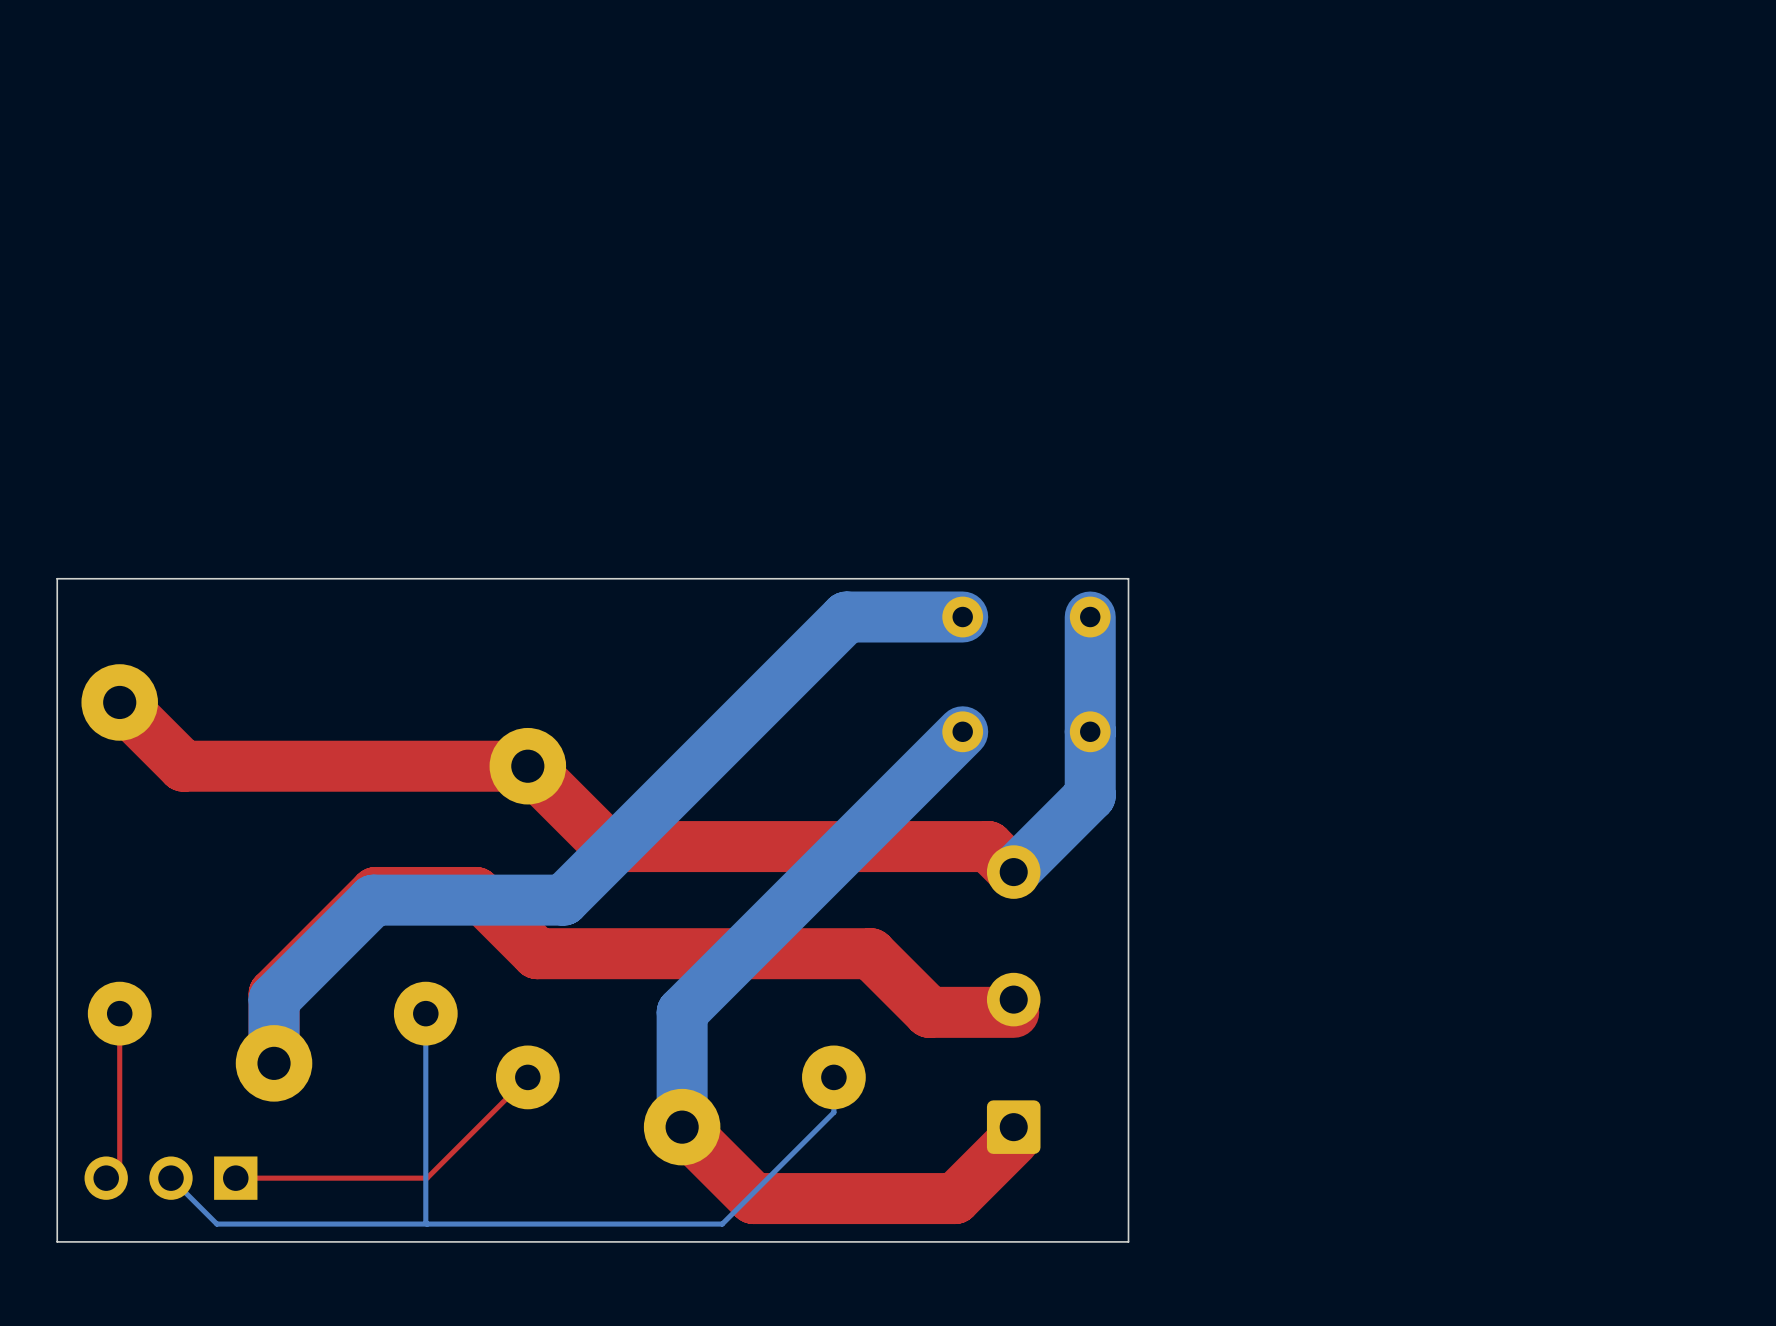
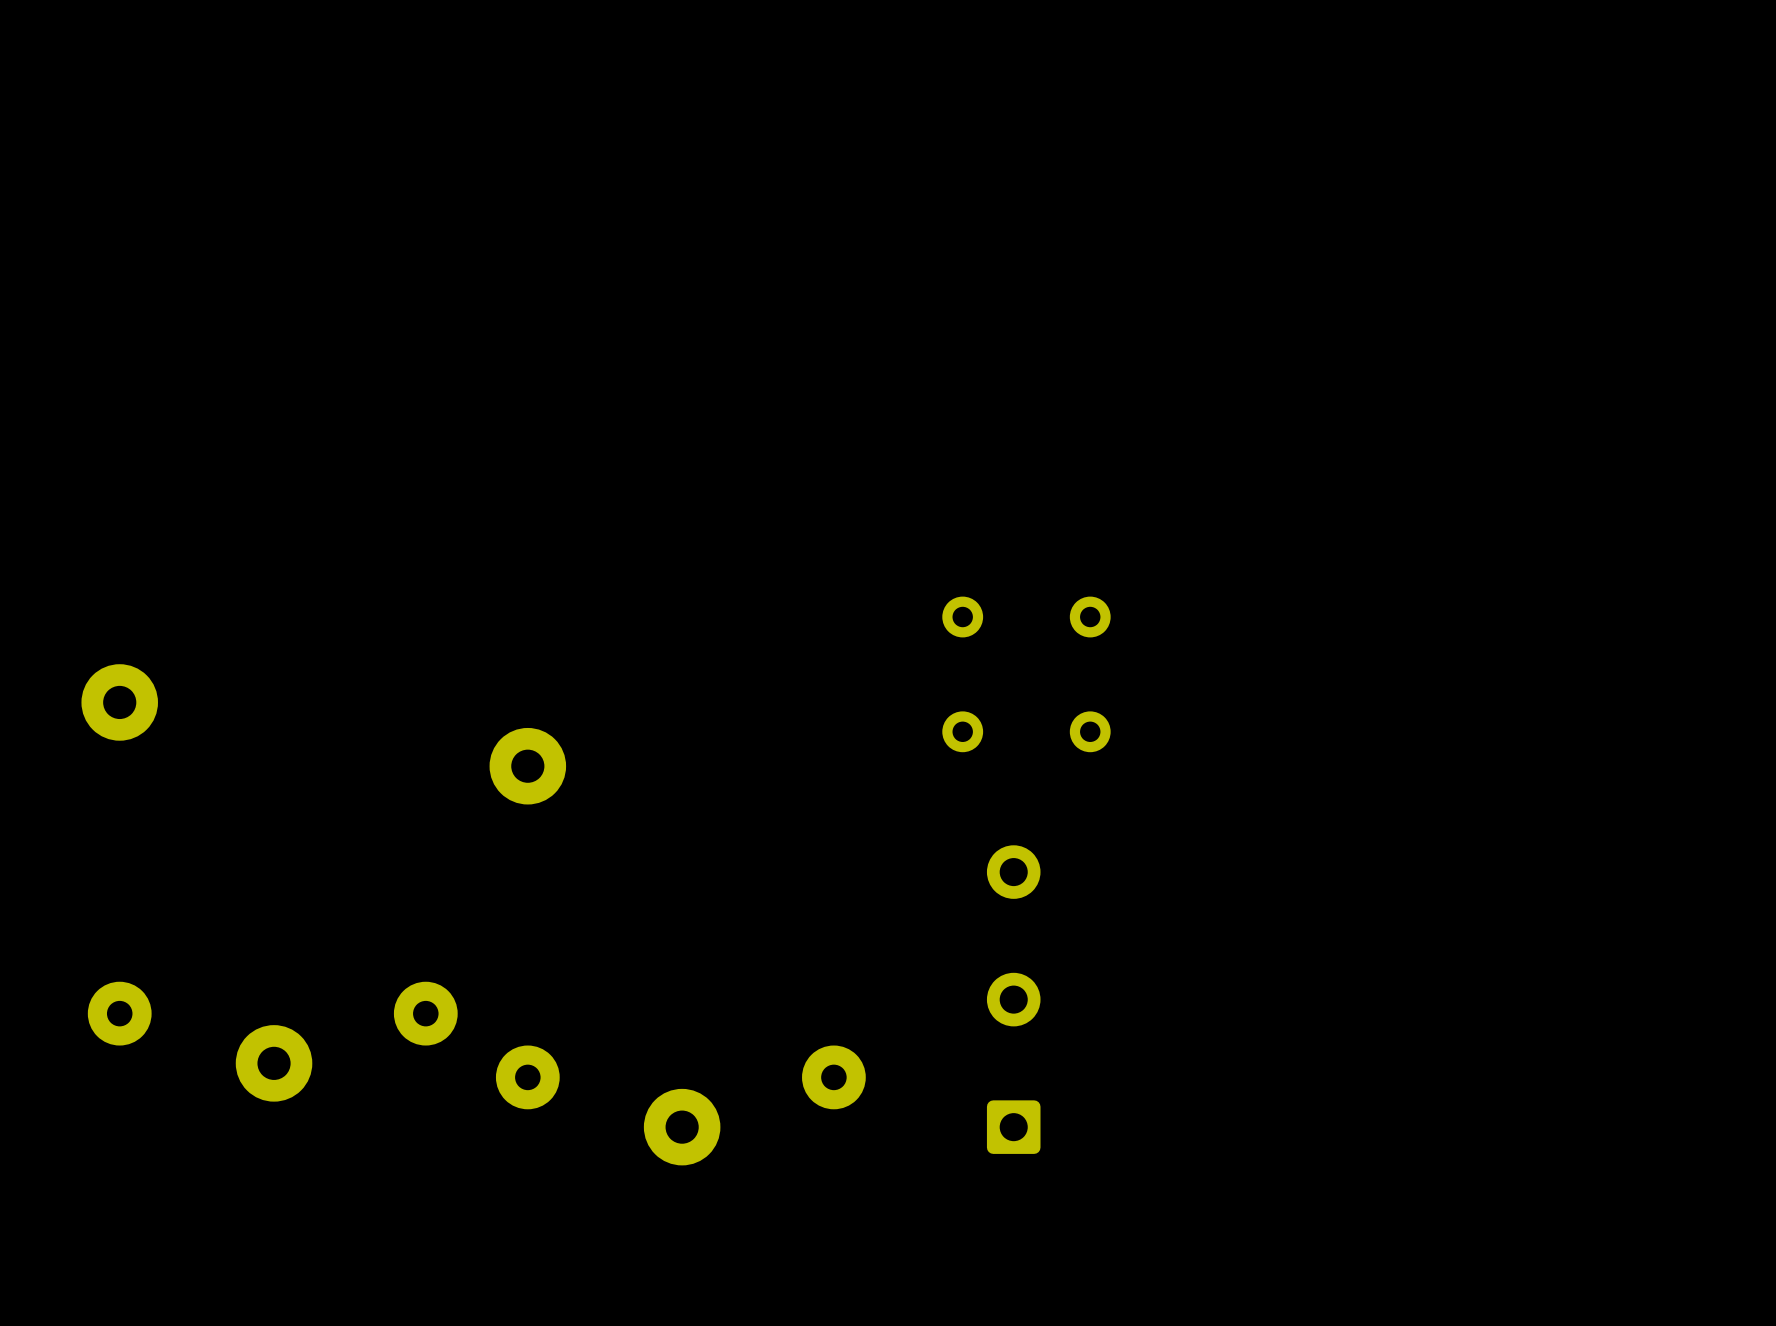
board edge: (1128, 578) (57, 578) (57, 1241) (1128, 1241) (1128, 578) -> none
bottom track: (962, 617) (846, 617) (563, 900) (373, 900) (274, 999) (274, 1063) -> none
bottom track: (1090, 617) (1090, 795) (1013, 872) -> none
top track: (119, 702) (183, 766) (540, 766) -> none
bottom track: (962, 731) (682, 1012) (682, 1127) -> none
top track: (527, 766) (608, 846) (988, 846) (1013, 872) -> none
top track: (1013, 1012) (929, 1012) (870, 953) (537, 953) (475, 892) (375, 892) (274, 994) (274, 1063) -> none
top track: (119, 1013) (119, 1164) (106, 1178) -> none
bottom track: (425, 1013) (427, 1224) -> none
top track: (527, 1077) (427, 1178) (235, 1178) -> none
bottom track: (833, 1077) (833, 1112) (722, 1224) (216, 1224) (170, 1178) -> none
top track: (682, 1127) (753, 1198) (955, 1198) (1013, 1139) -> none
part: (170, 1178) -> none

